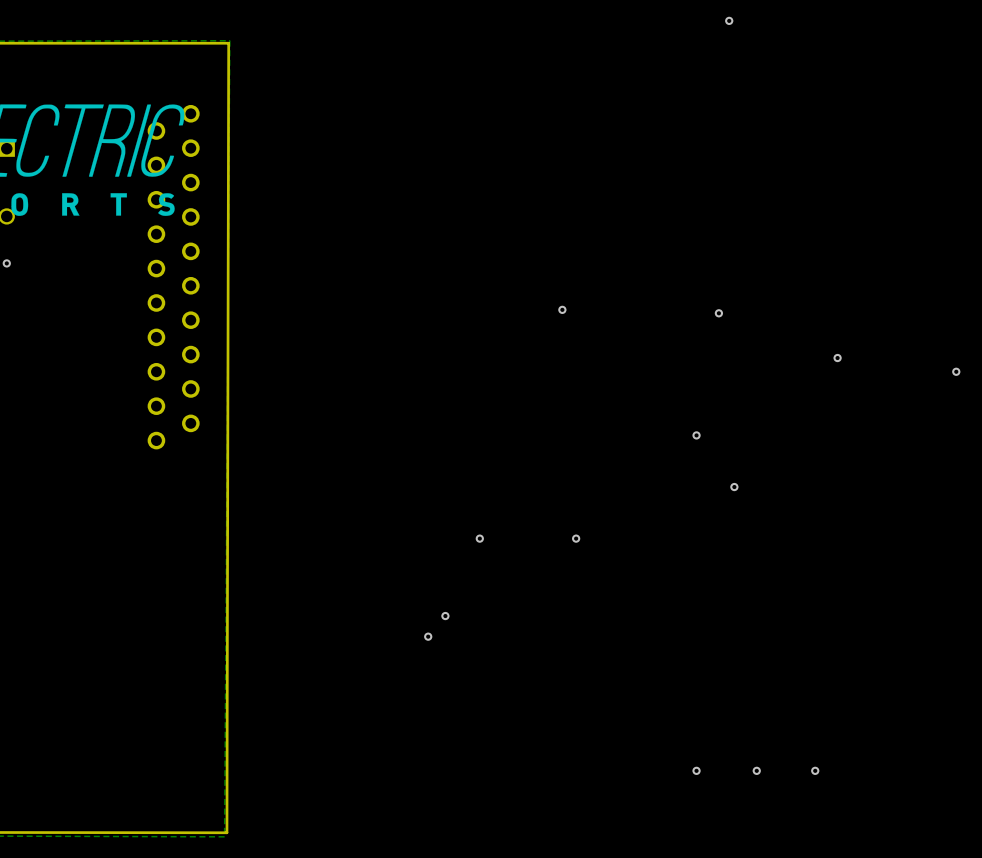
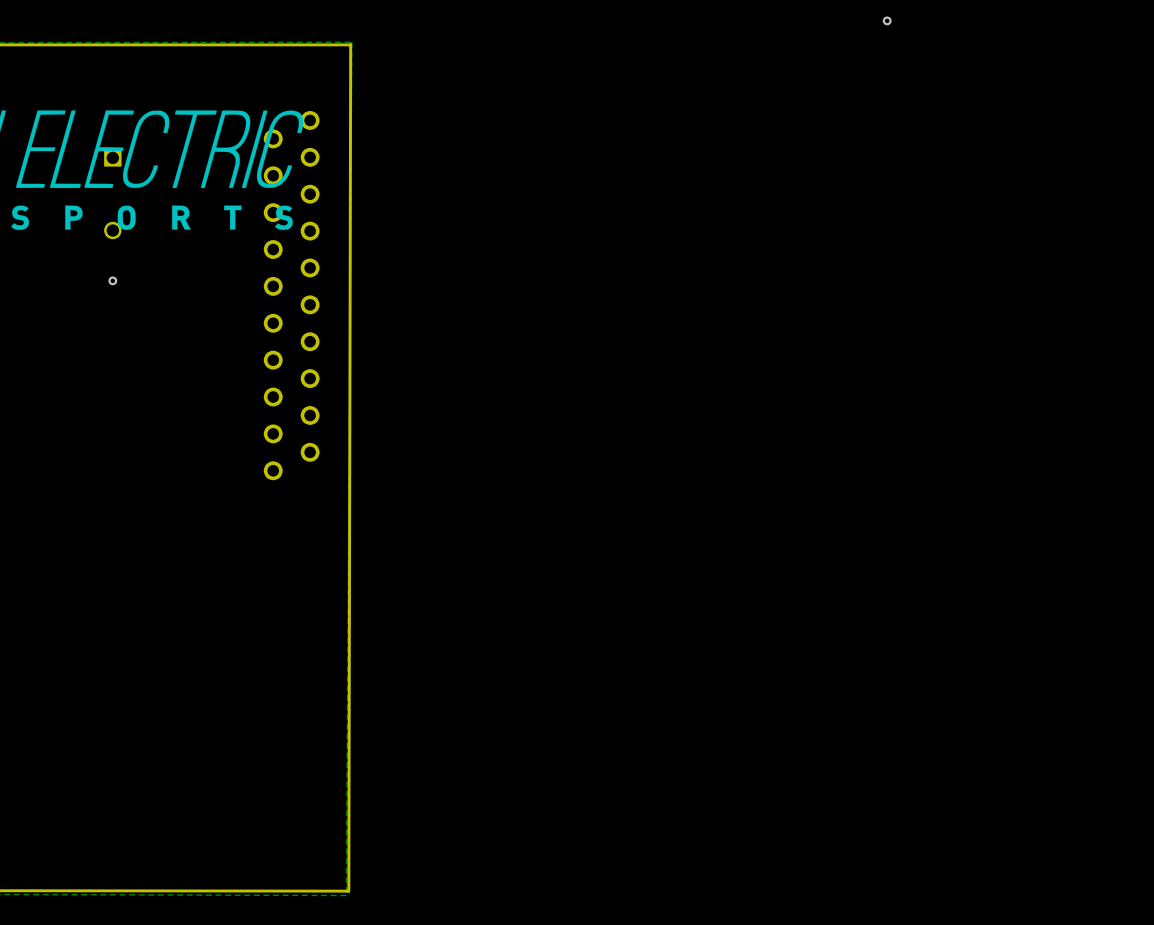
via: (562, 309) -> none
via: (718, 313) -> none
via: (837, 358) -> none
via: (956, 371) -> none
via: (696, 435) -> none
via: (734, 487) -> none
via: (479, 538) -> none
via: (576, 538) -> none
via: (445, 616) -> none
via: (428, 636) -> none
via: (696, 770) -> none
via: (756, 770) -> none
via: (815, 770) -> none

